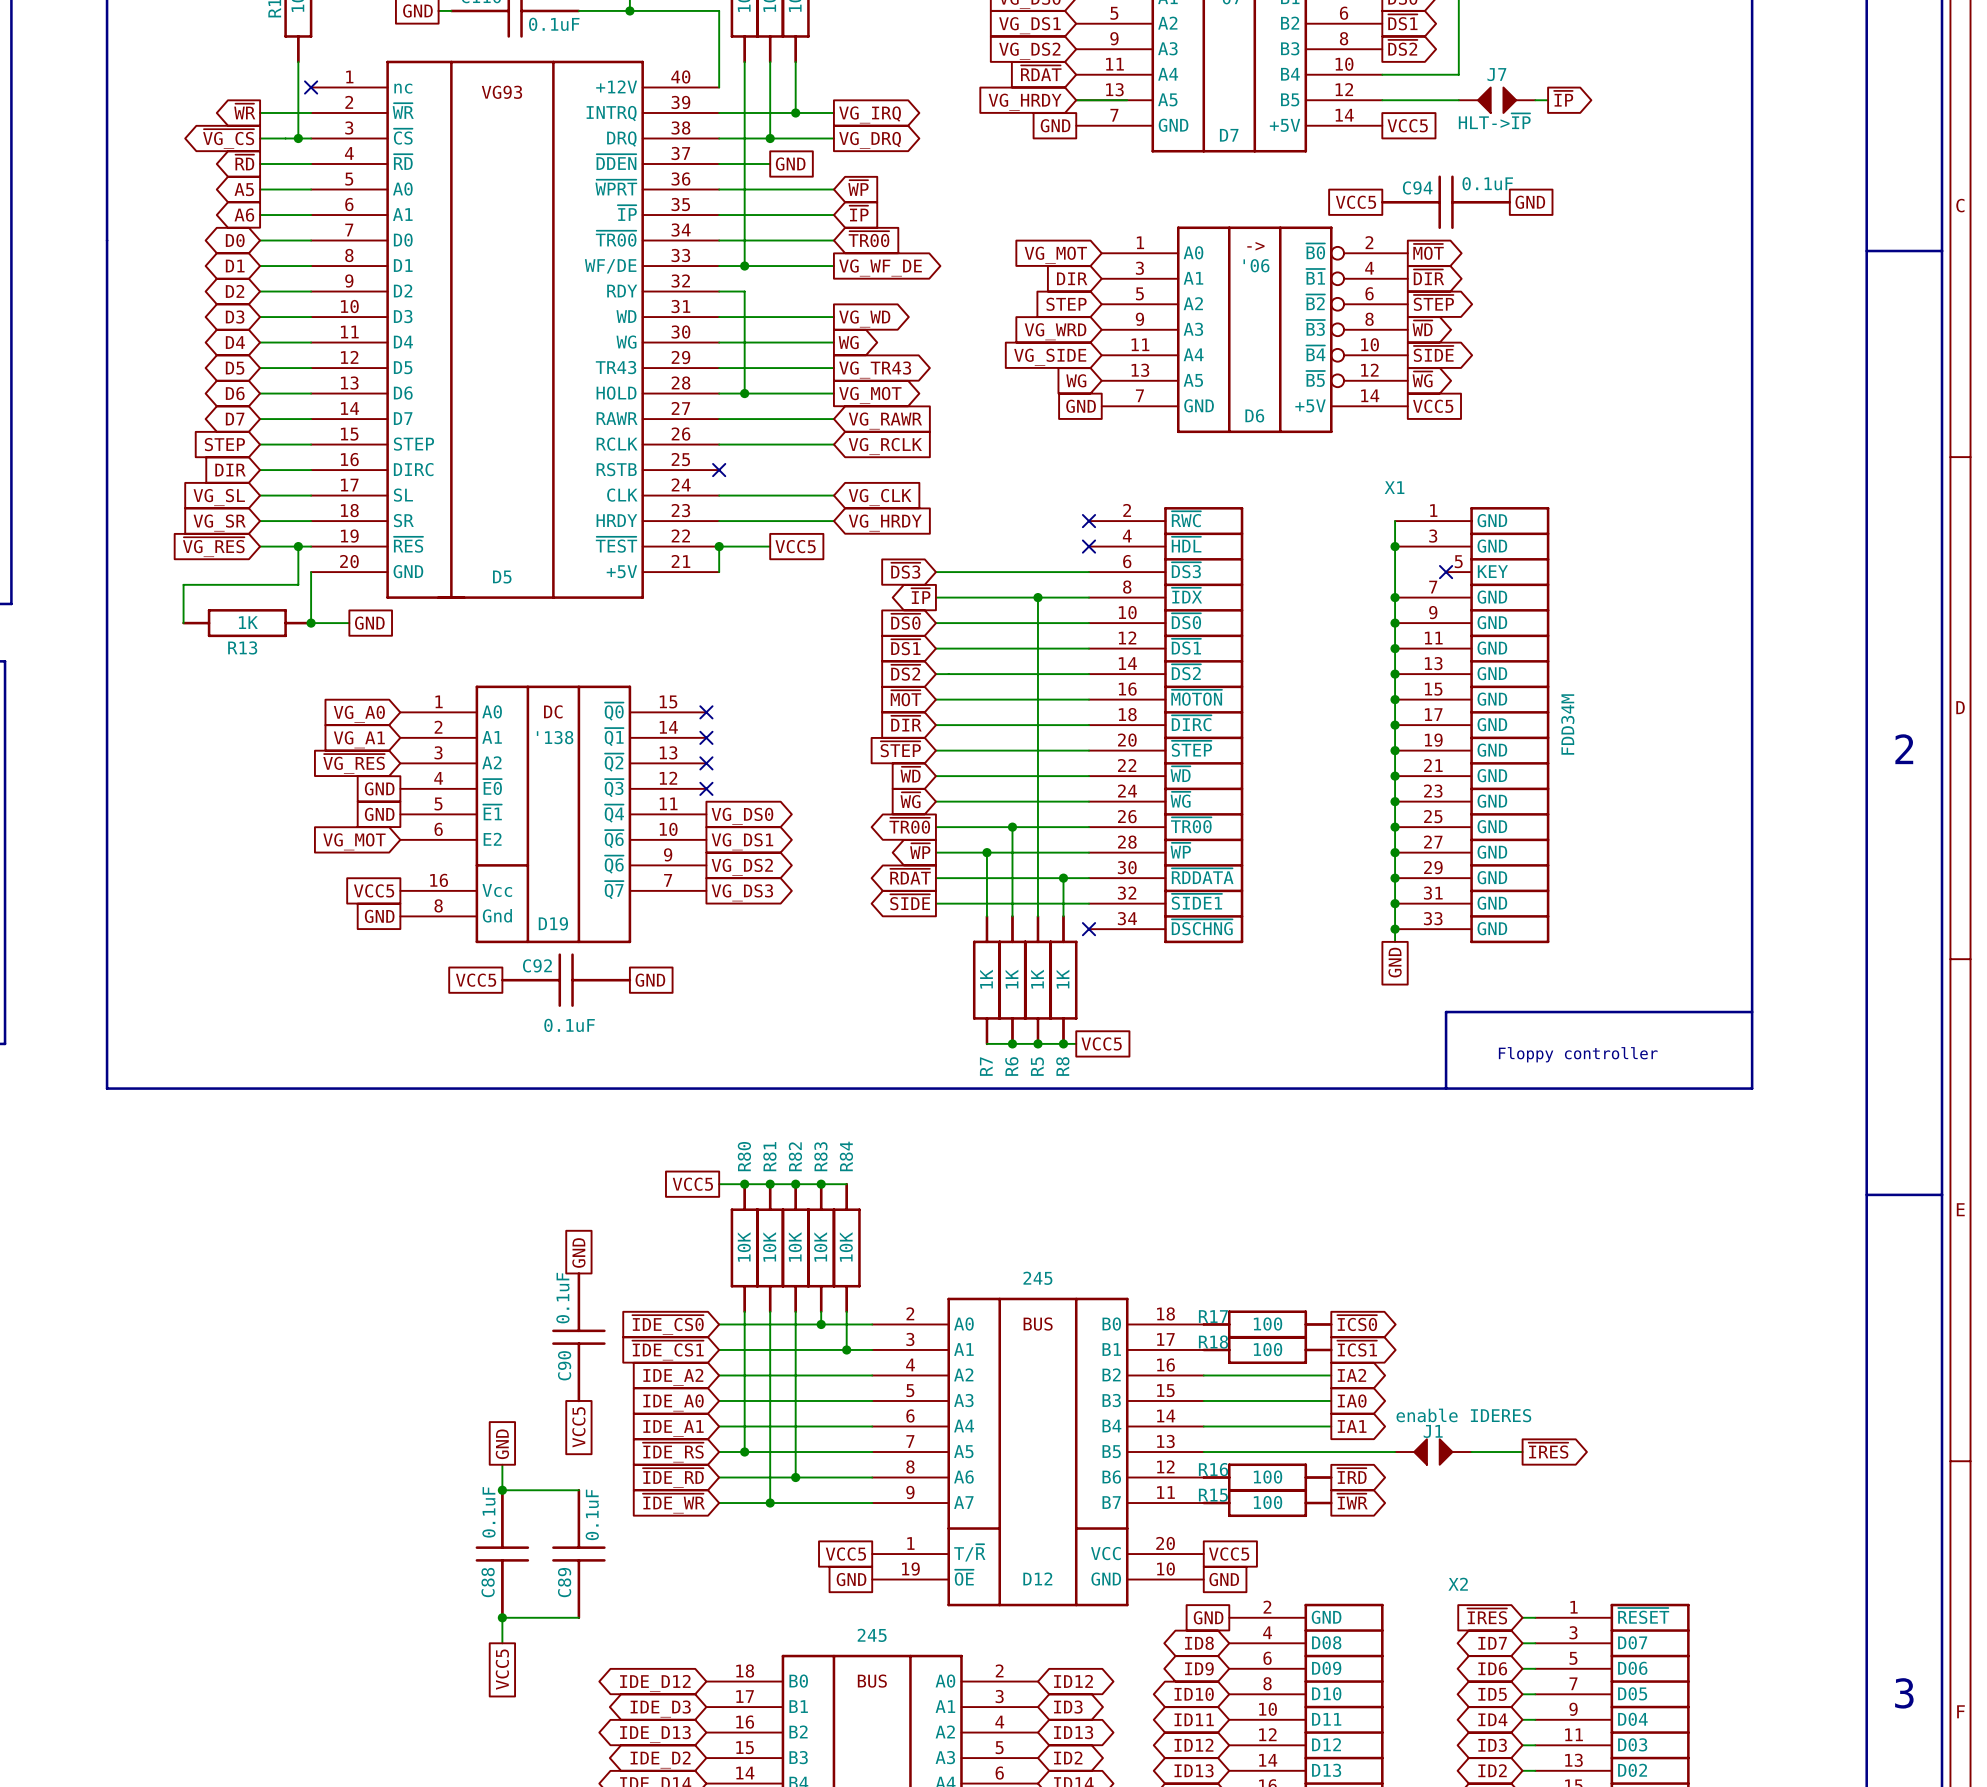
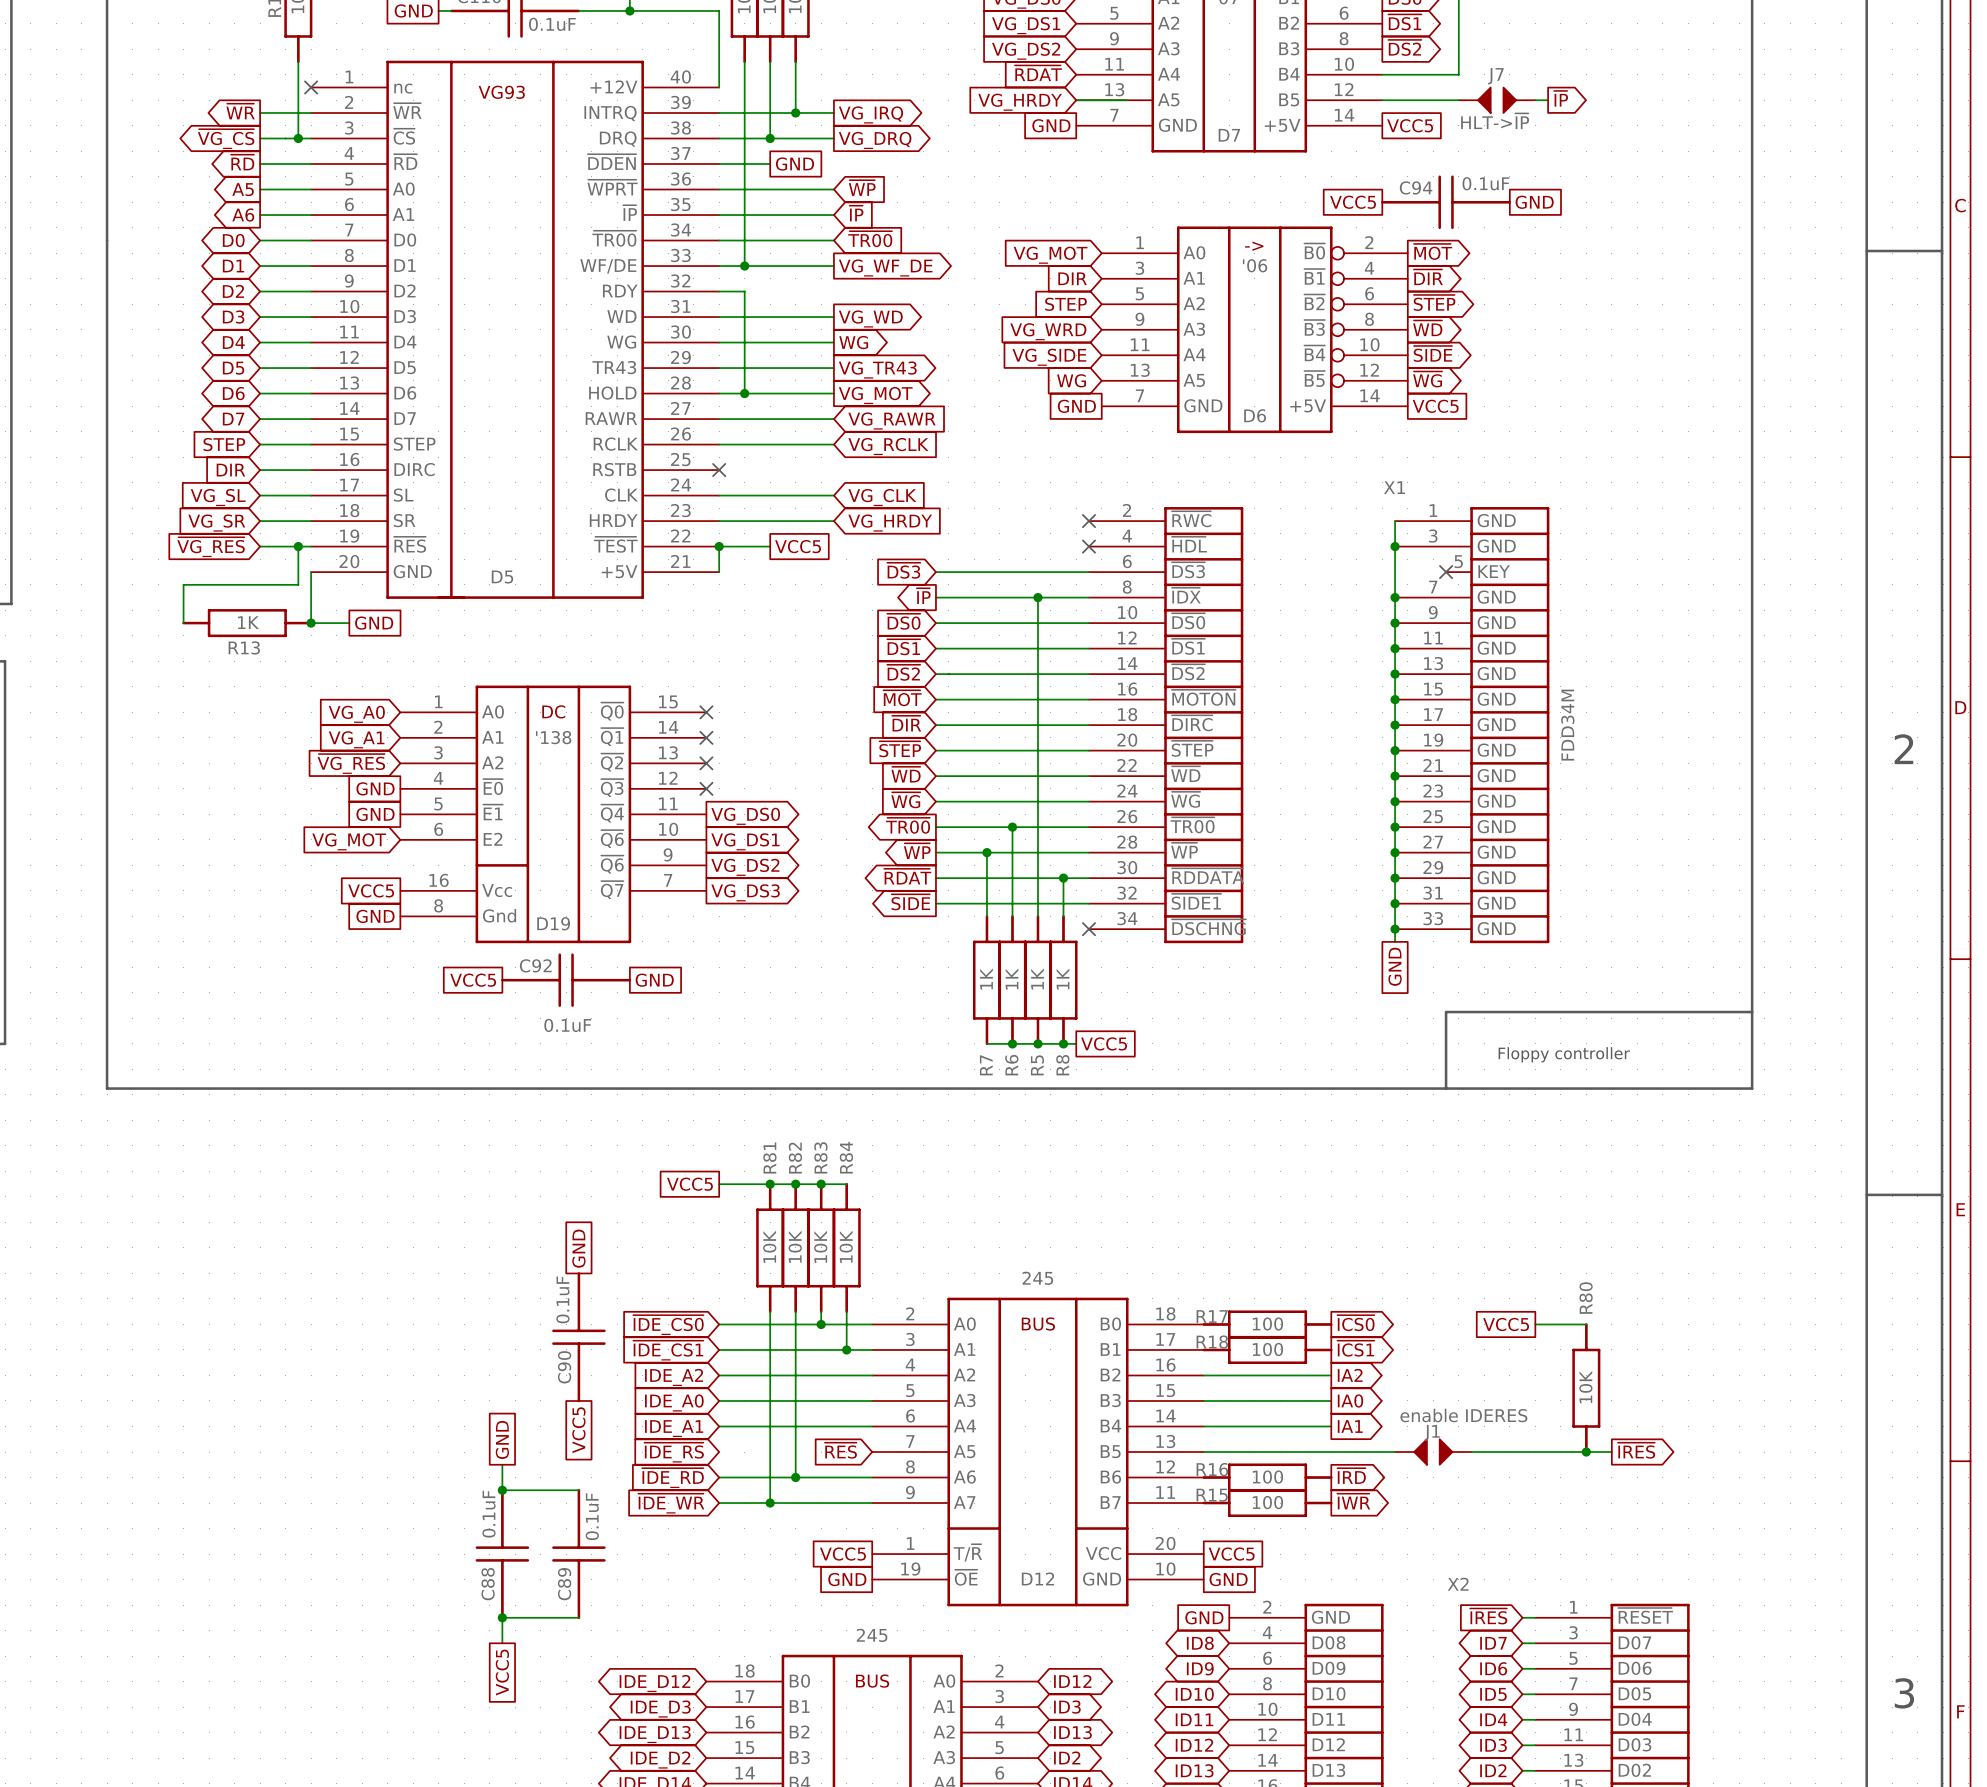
junction: (744, 1184) -> none
R80 position: (744, 1247) -> (1586, 1388)
wire: (744, 1311) (744, 1452) -> none
global label: none -> VCC5 (1506, 1324)
wire: none -> (1535, 1324) (1586, 1324)
global label: none -> ~{RES} (840, 1450)
global label position: ~{IRES} (1548, 1450) -> ~{IRES} (1636, 1450)
wire: (719, 1452) (872, 1452) -> none
junction: (744, 1452) -> none
wire: none -> (1522, 1452) (1611, 1452)
junction: none -> (1586, 1452)

